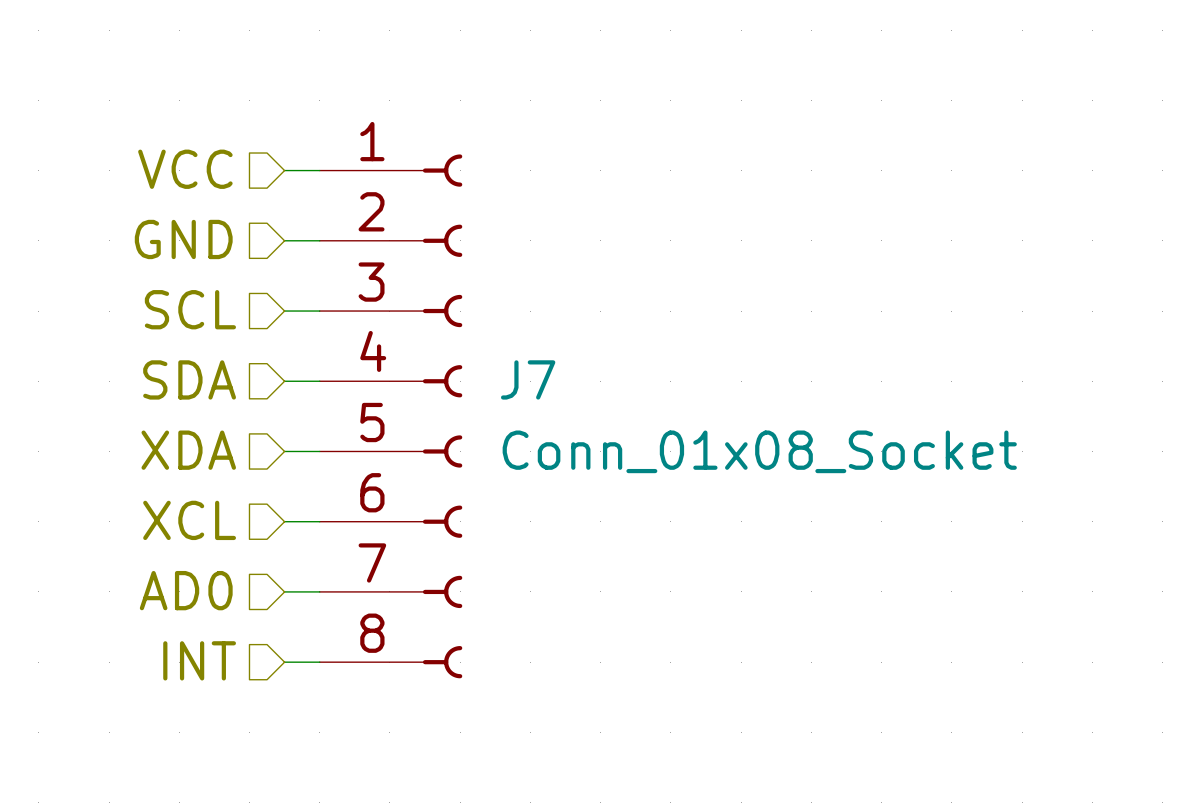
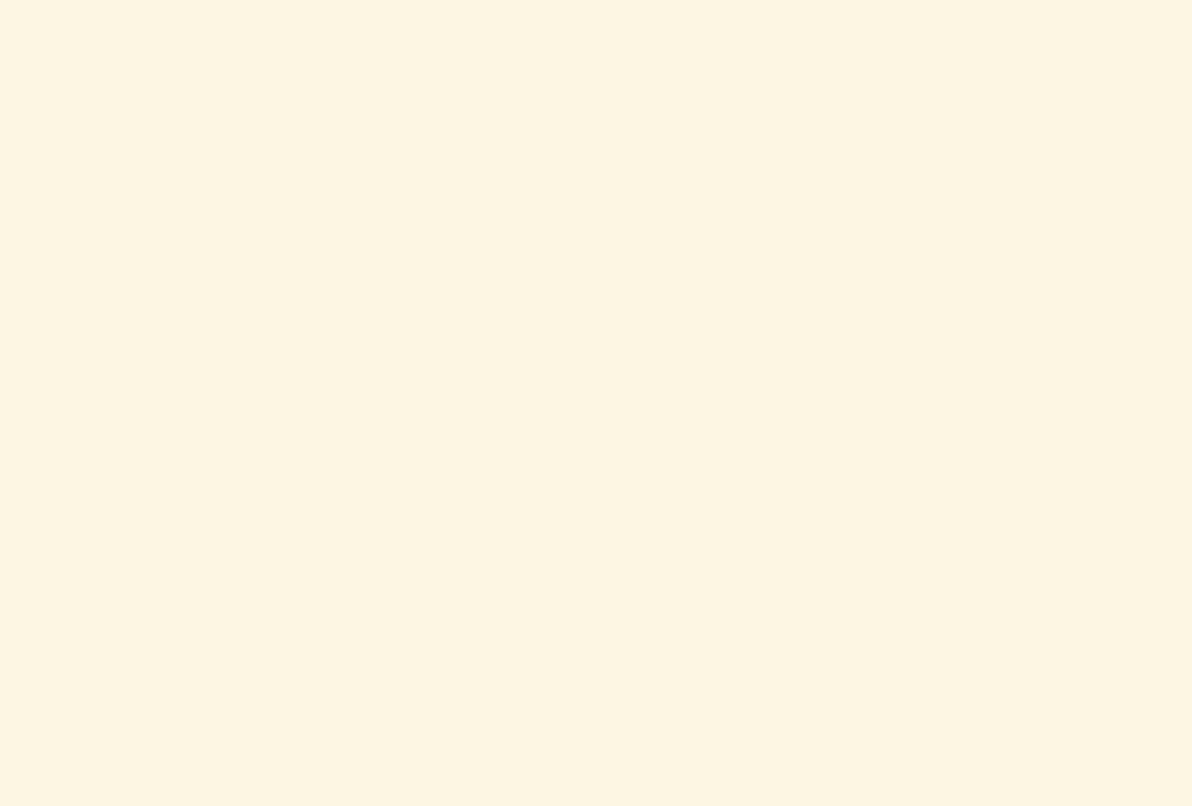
hierarchical label: VCC (185, 169) -> none
wire: (284, 170) (319, 170) -> none
hierarchical label: GND (183, 239) -> none
wire: (284, 240) (319, 240) -> none
hierarchical label: SCL (190, 309) -> none
wire: (284, 311) (319, 311) -> none
hierarchical label: SDA (189, 379) -> none
wire: (284, 381) (319, 381) -> none
J7: Conn_01x08_Socket (390, 416) -> none
hierarchical label: XDA (188, 450) -> none
wire: (284, 451) (319, 451) -> none
hierarchical label: XCL (189, 520) -> none
wire: (284, 521) (319, 521) -> none
hierarchical label: AD0 (186, 590) -> none
wire: (284, 591) (319, 591) -> none
hierarchical label: INT (199, 660) -> none
wire: (284, 662) (319, 662) -> none

